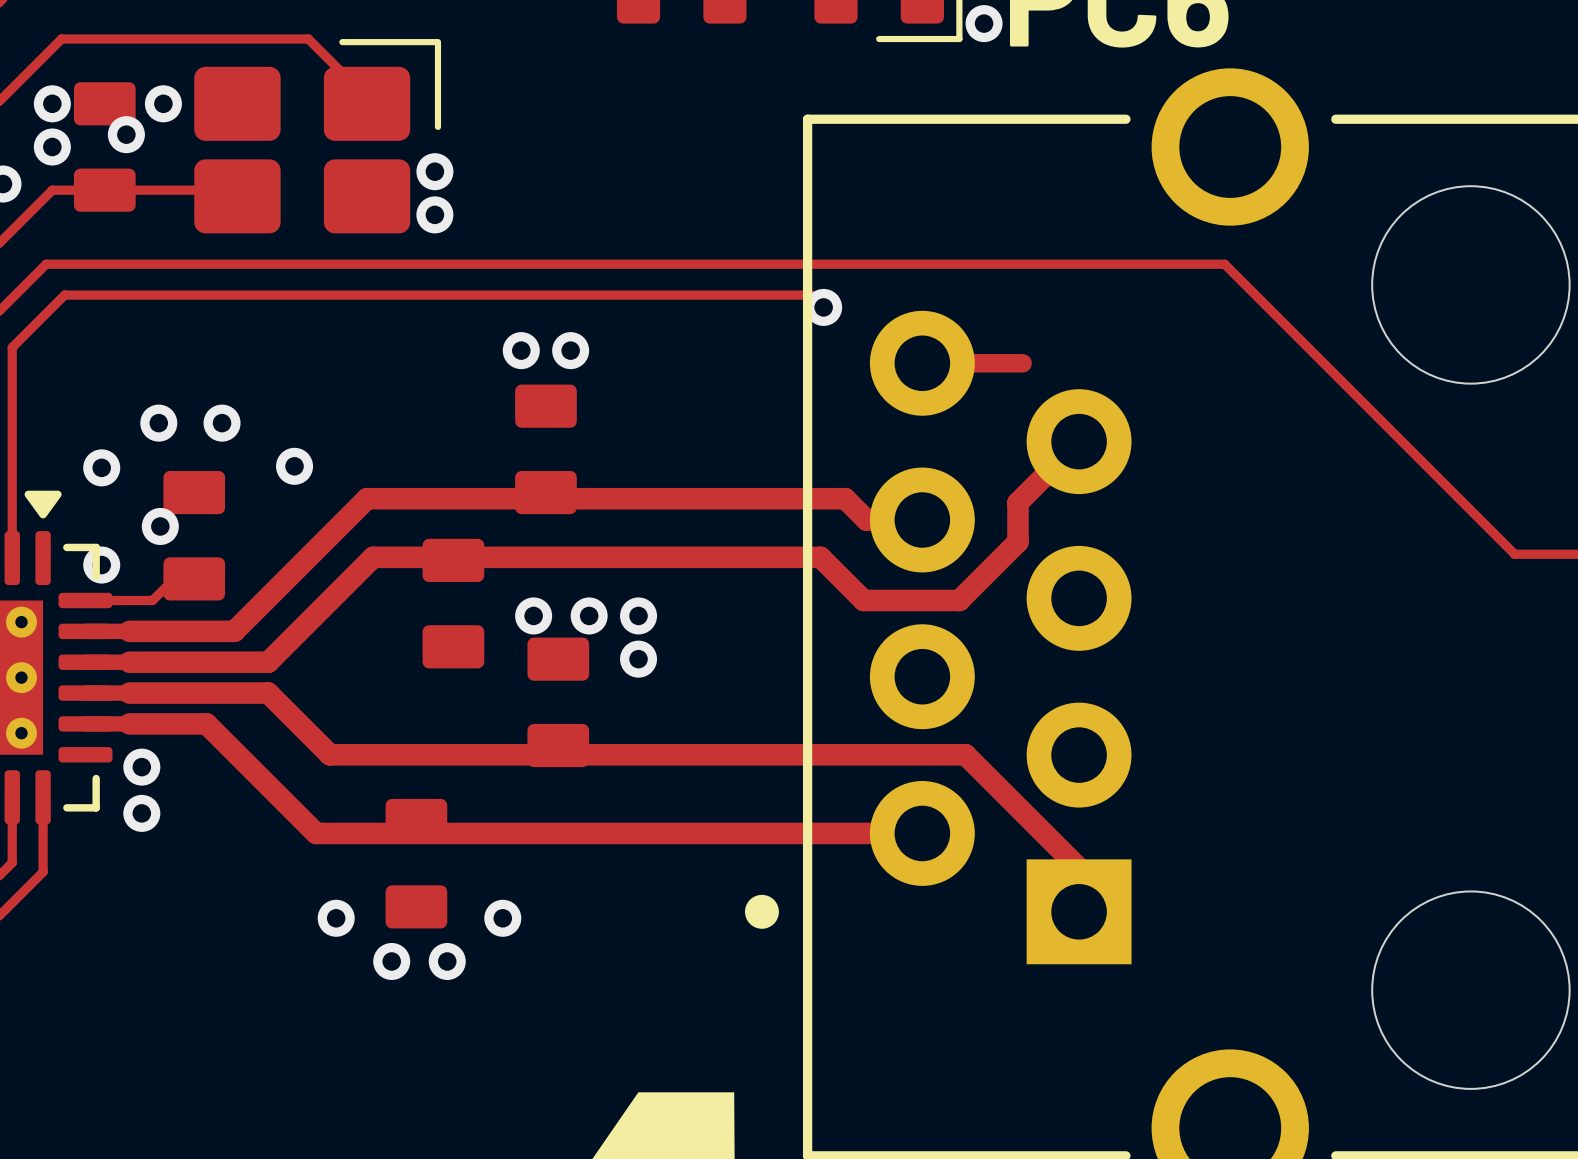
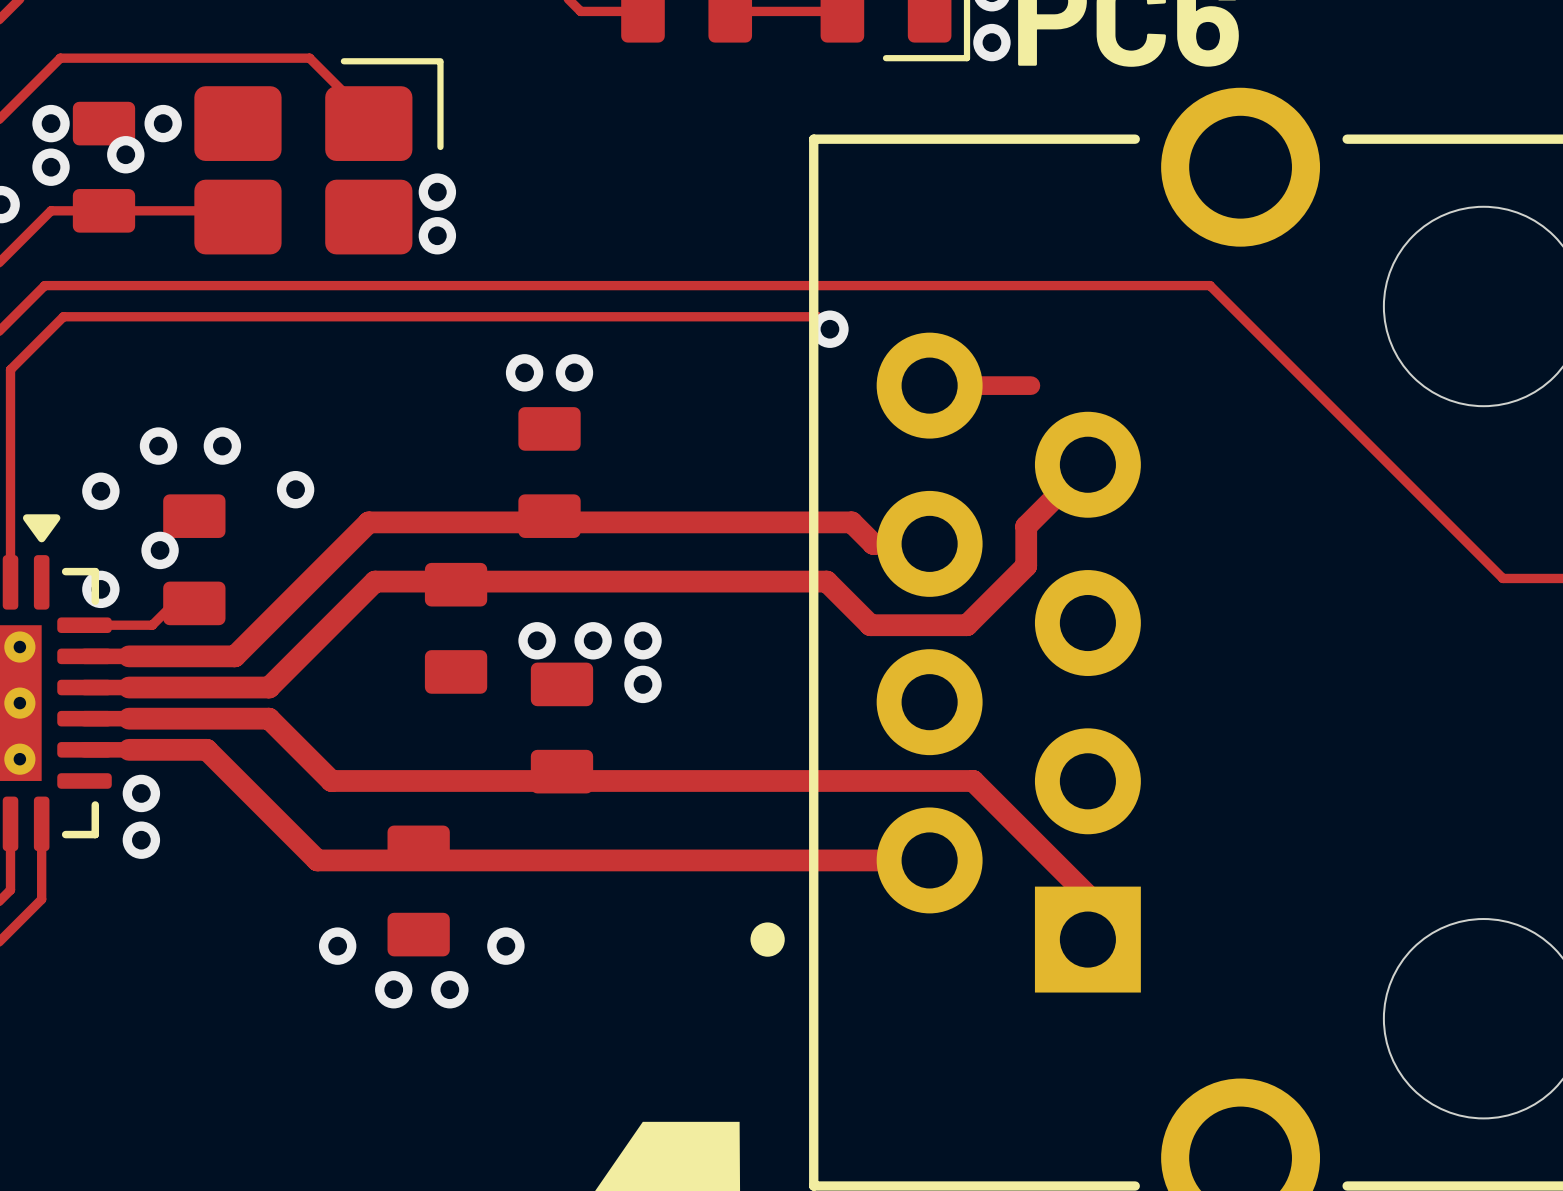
track: (1200, 264) (1224, 264) (1514, 554) -> (1210, 285) (1502, 578) (1527, 578)

